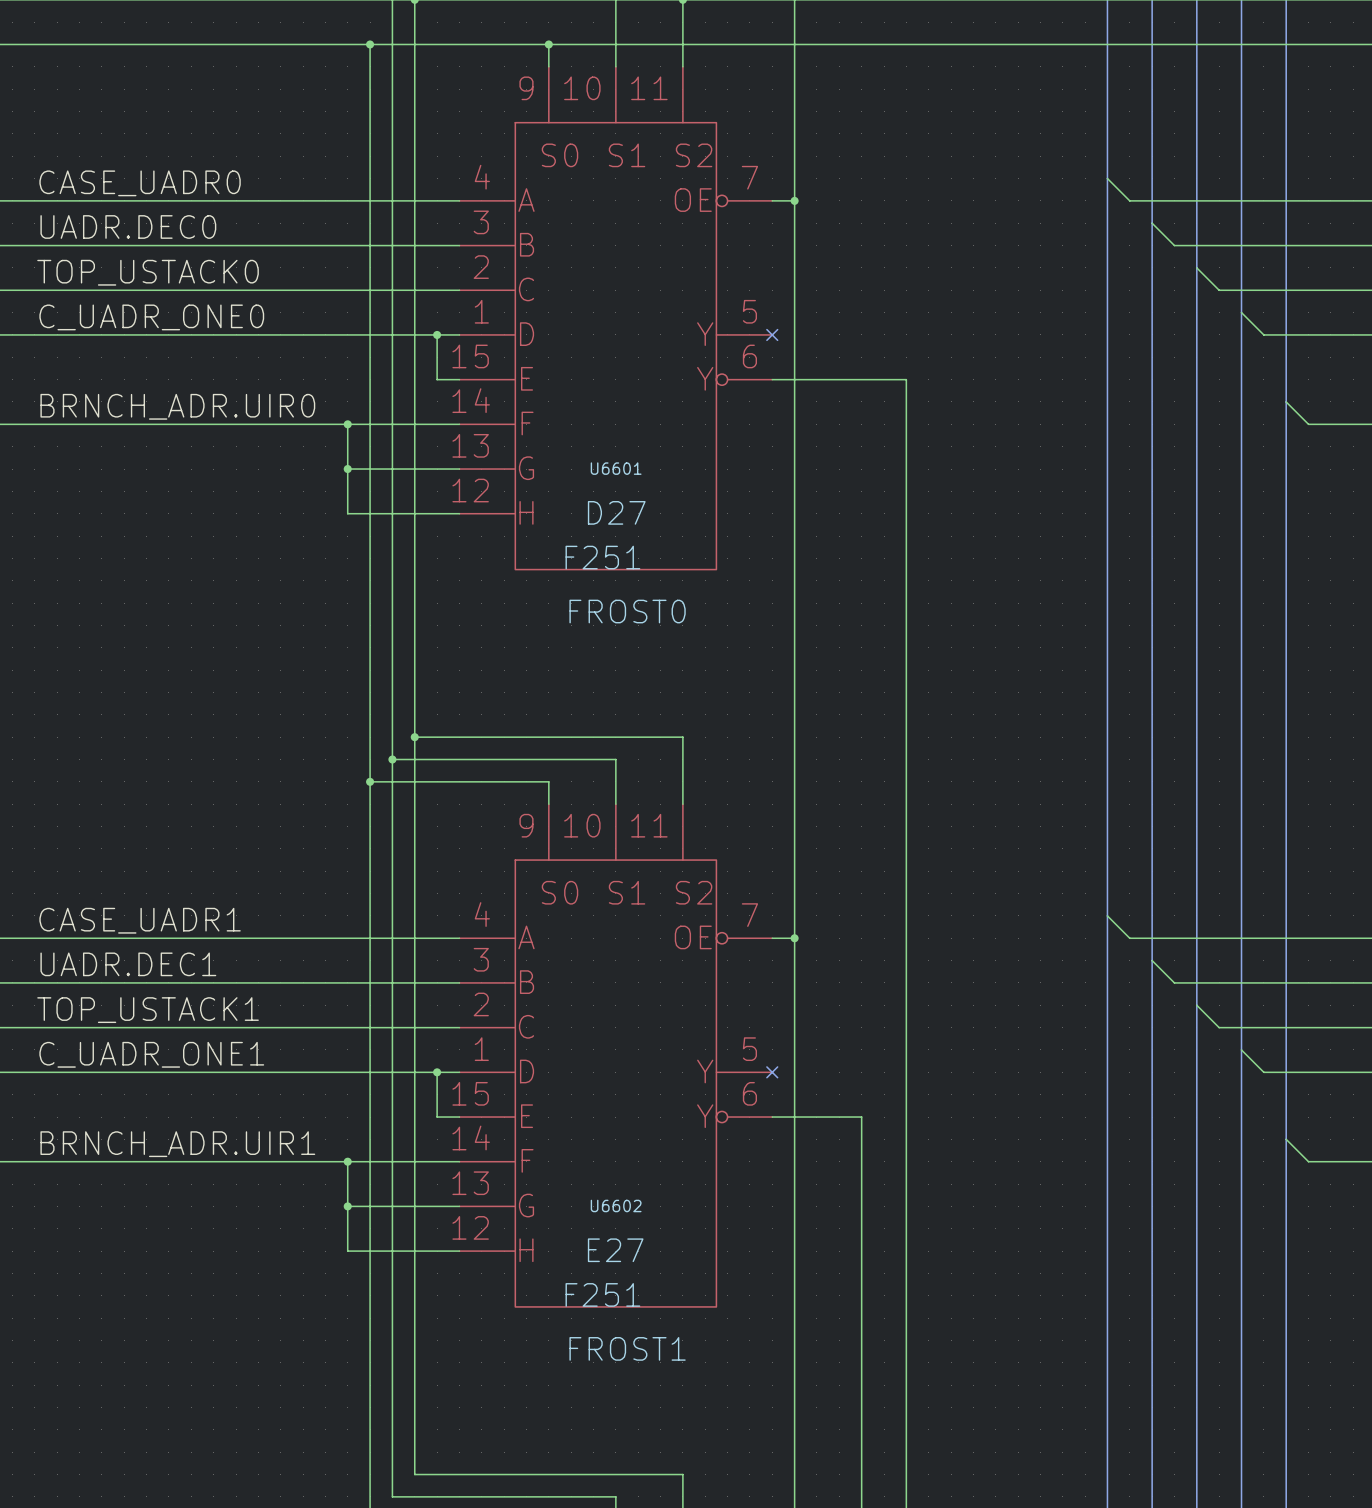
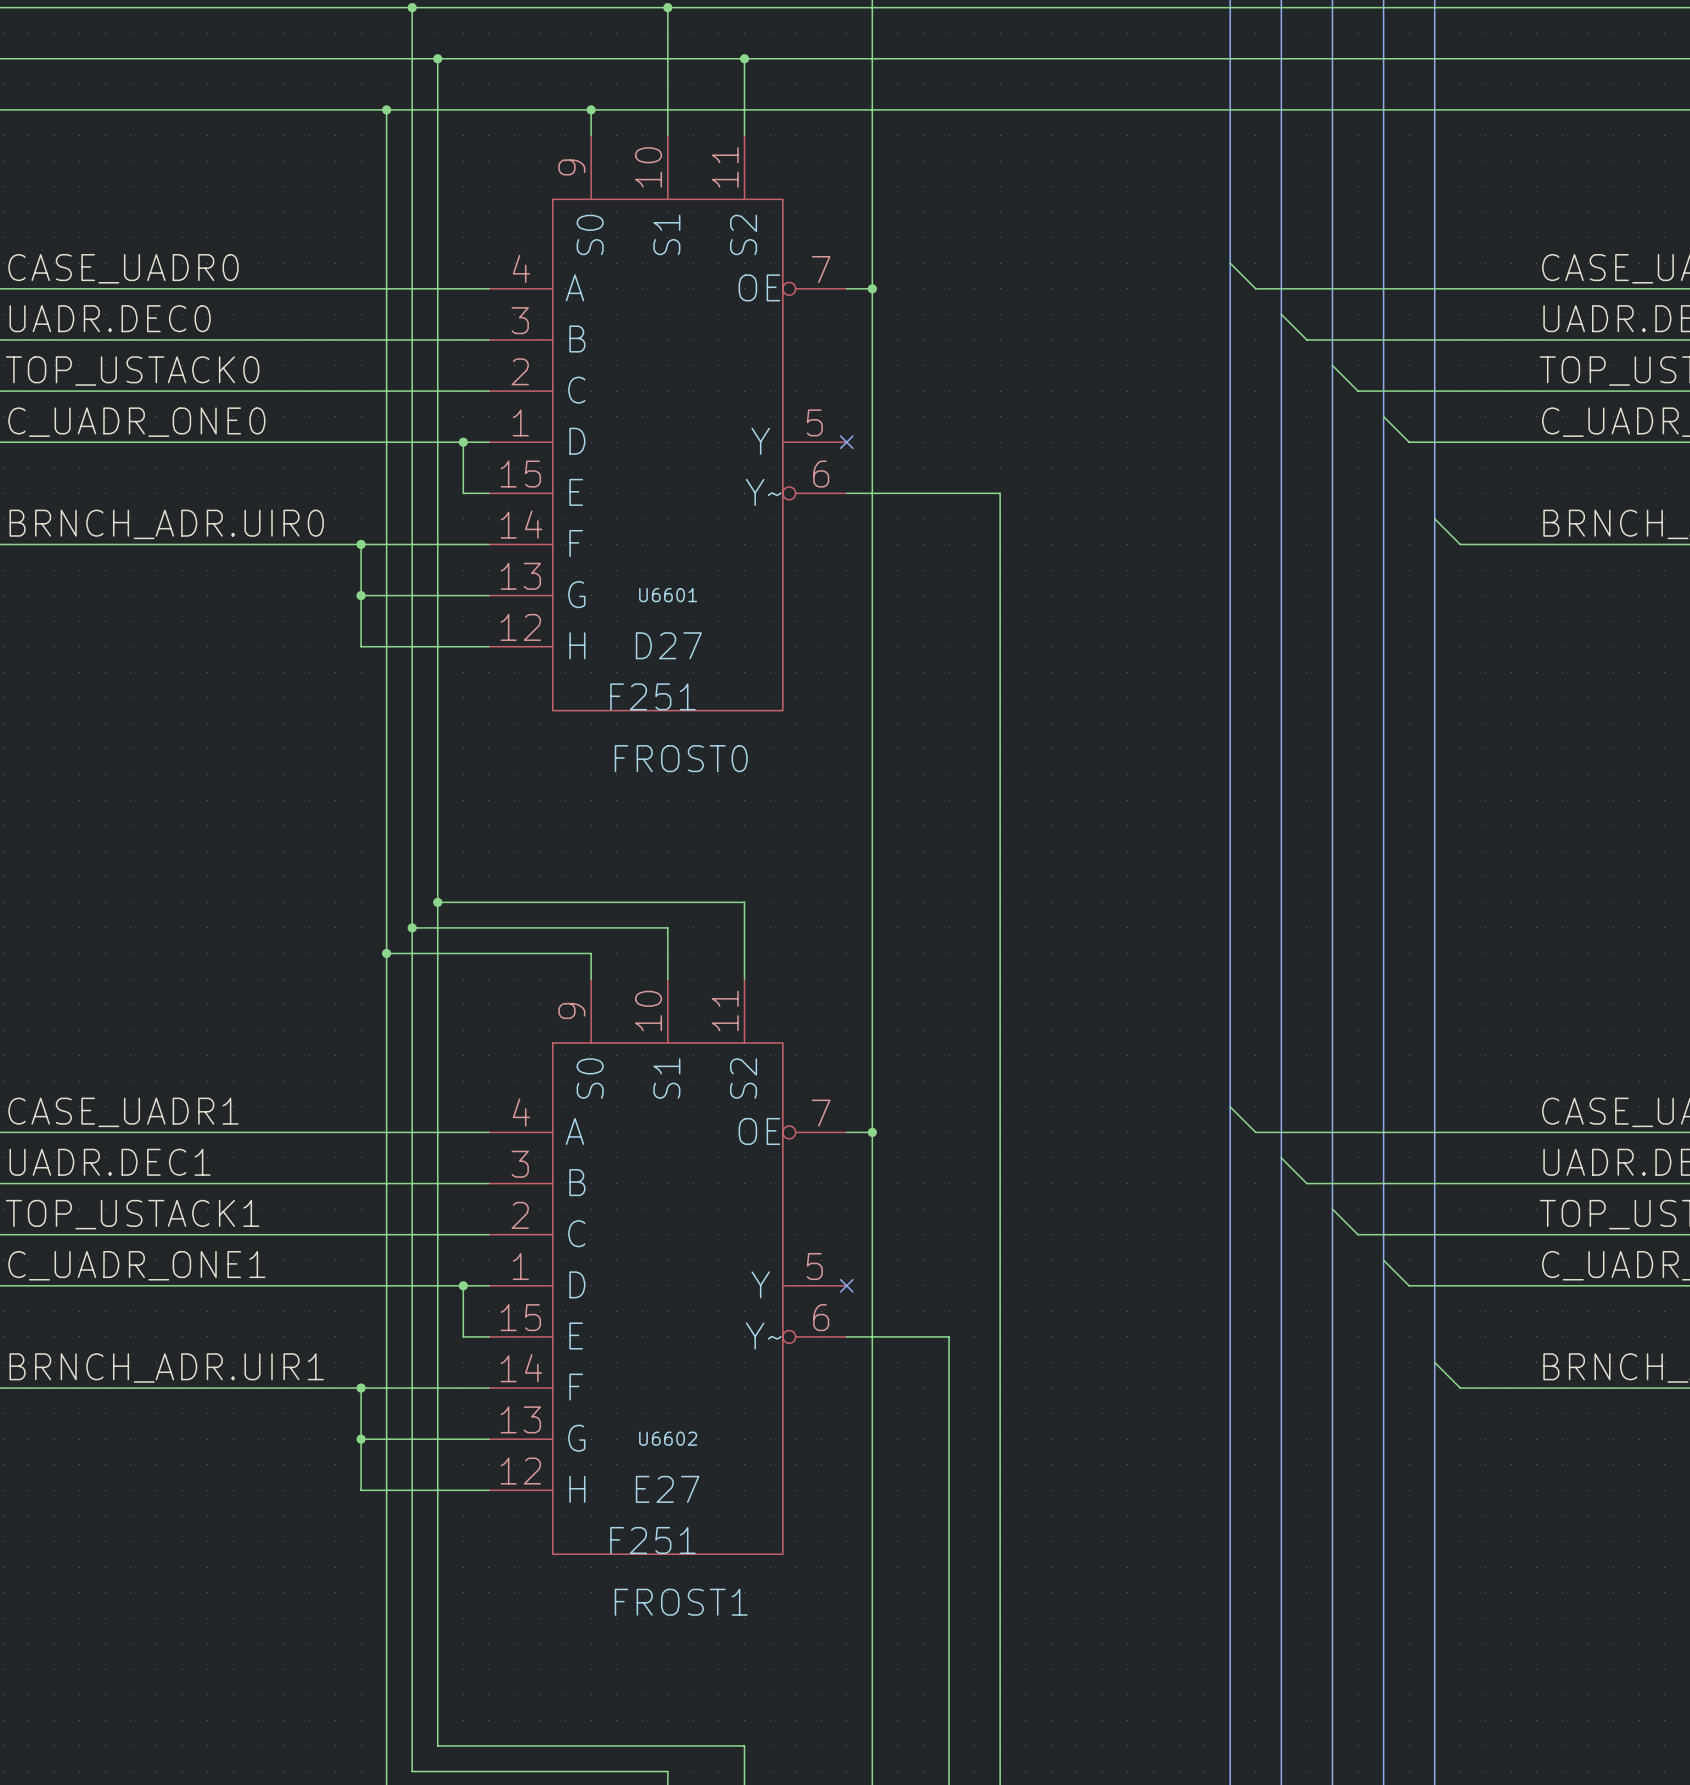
U6601 symbol: [459, 66, 773, 570] -> [488, 135, 847, 711]
U6602 symbol: [459, 804, 773, 1307] -> [488, 979, 847, 1555]

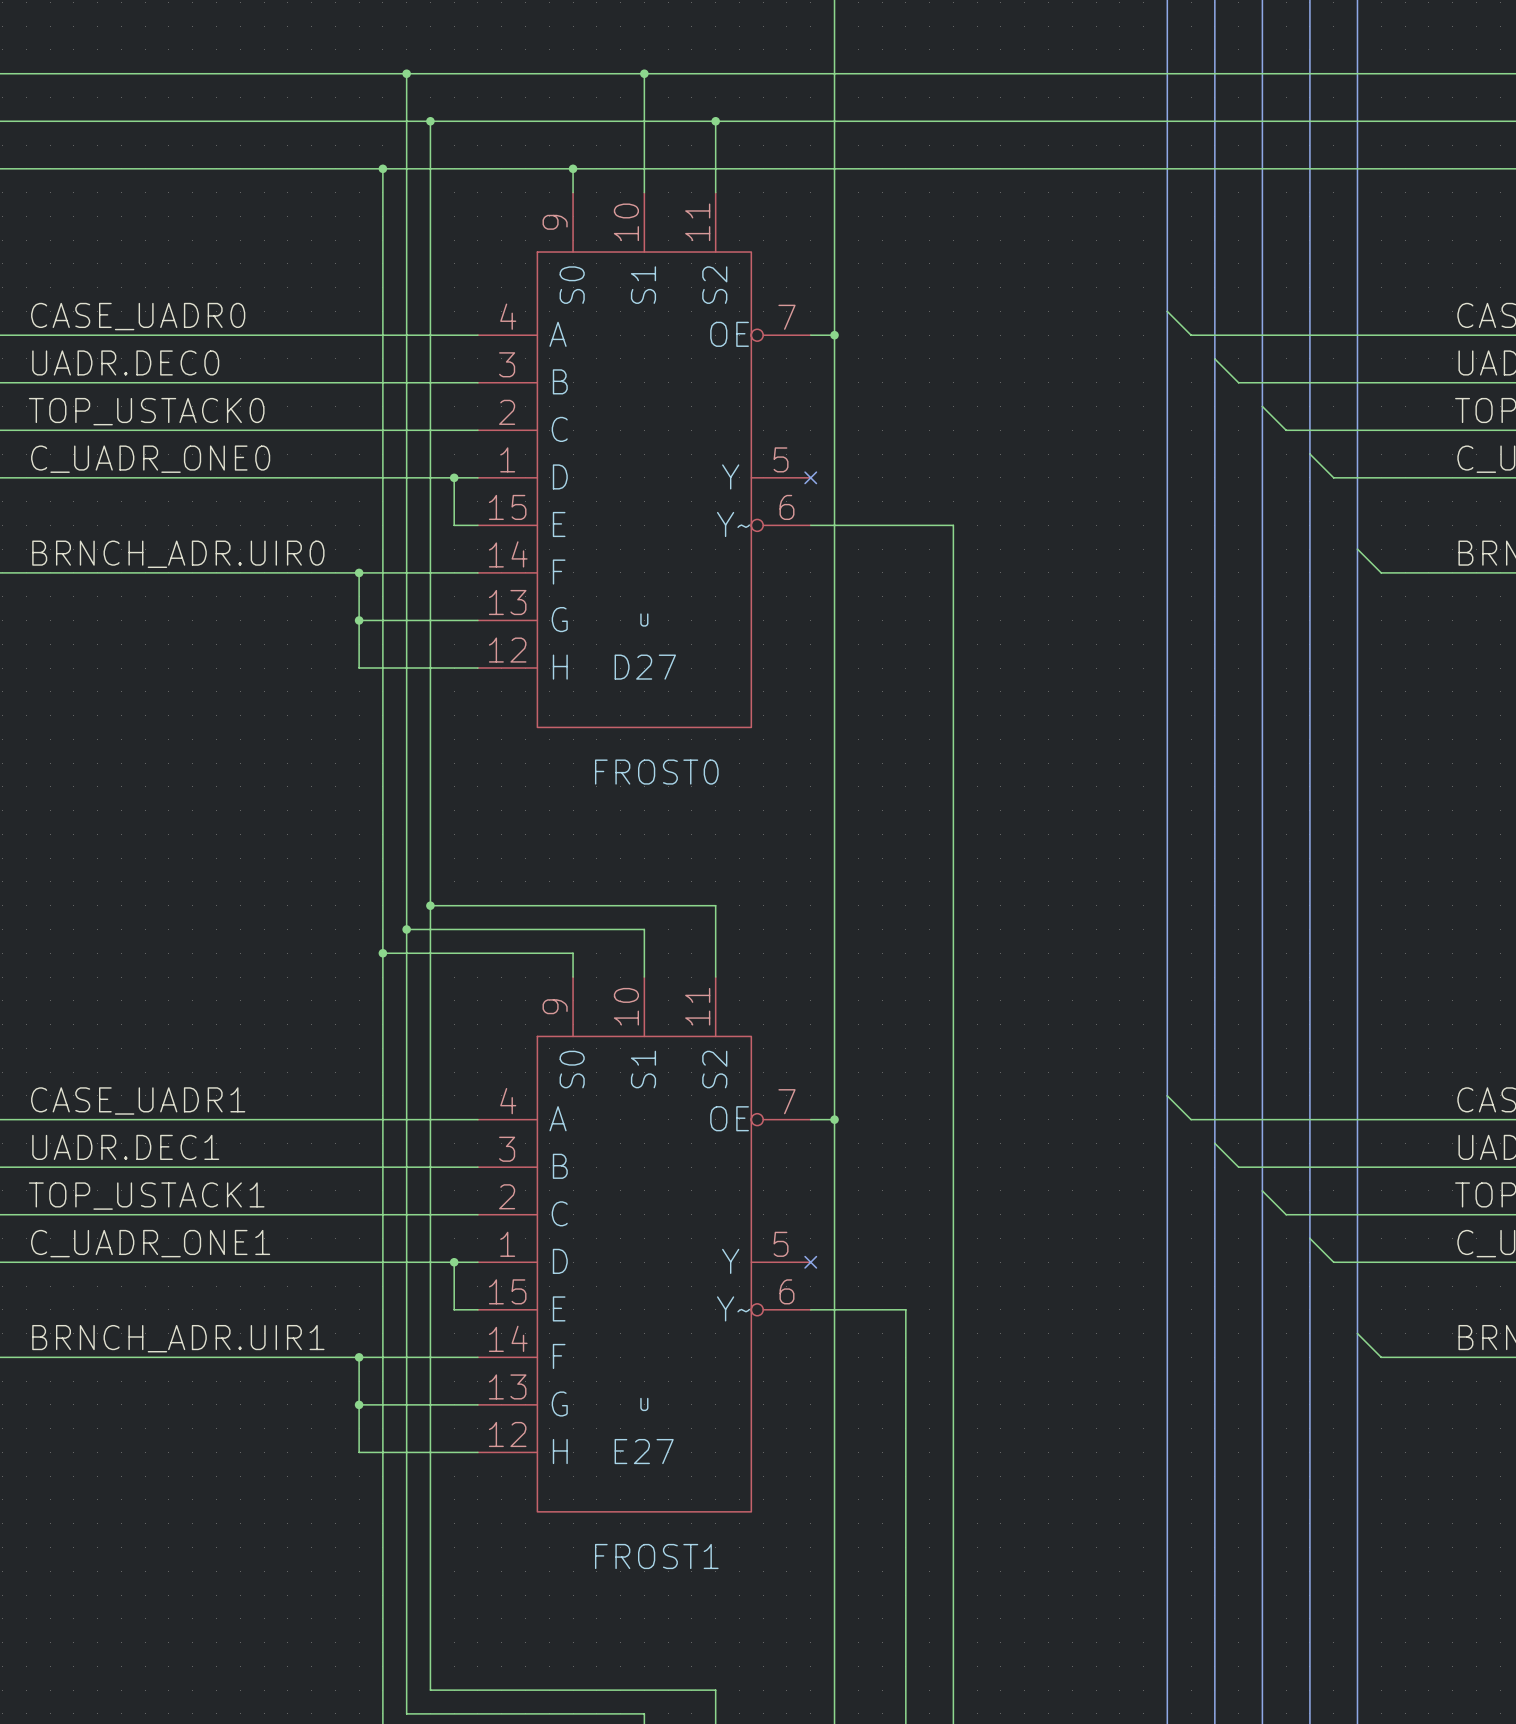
U6601 name: U6601 (668, 595) -> U (644, 620)
U6601 value: F251 (653, 696) -> none
U6602 name: U6602 (668, 1438) -> U (644, 1404)
U6602 value: F251 (653, 1540) -> none

